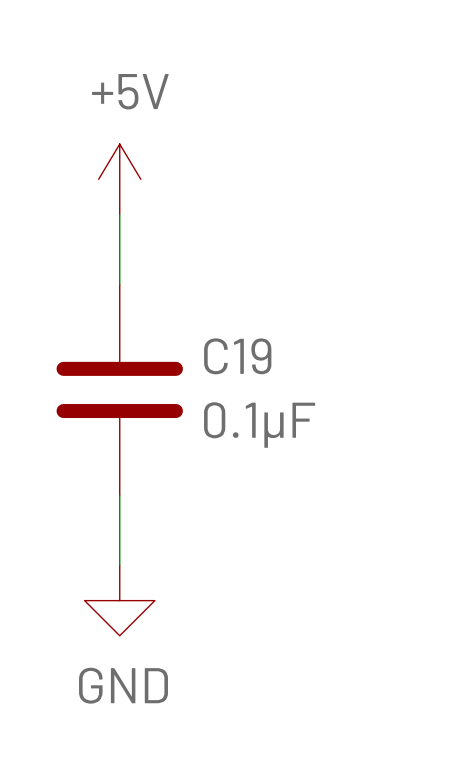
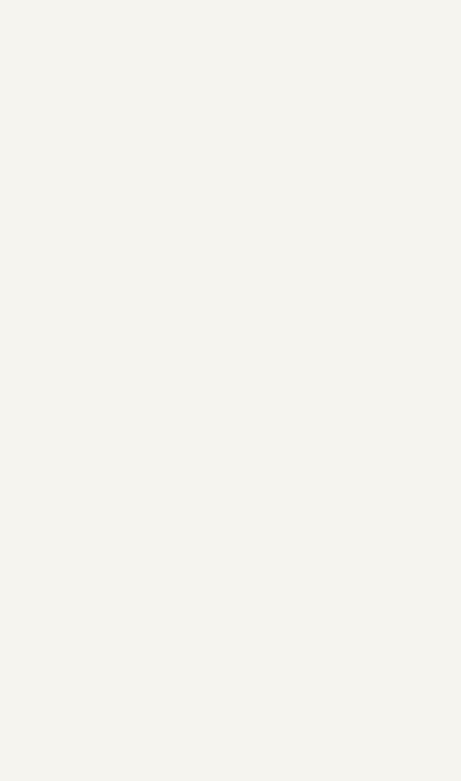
power symbol: +5V (119, 179) -> none
wire: (119, 214) (119, 284) -> none
C19: 0.1µF (119, 389) -> none
wire: (119, 495) (119, 565) -> none
power symbol: GND (119, 600) -> none

